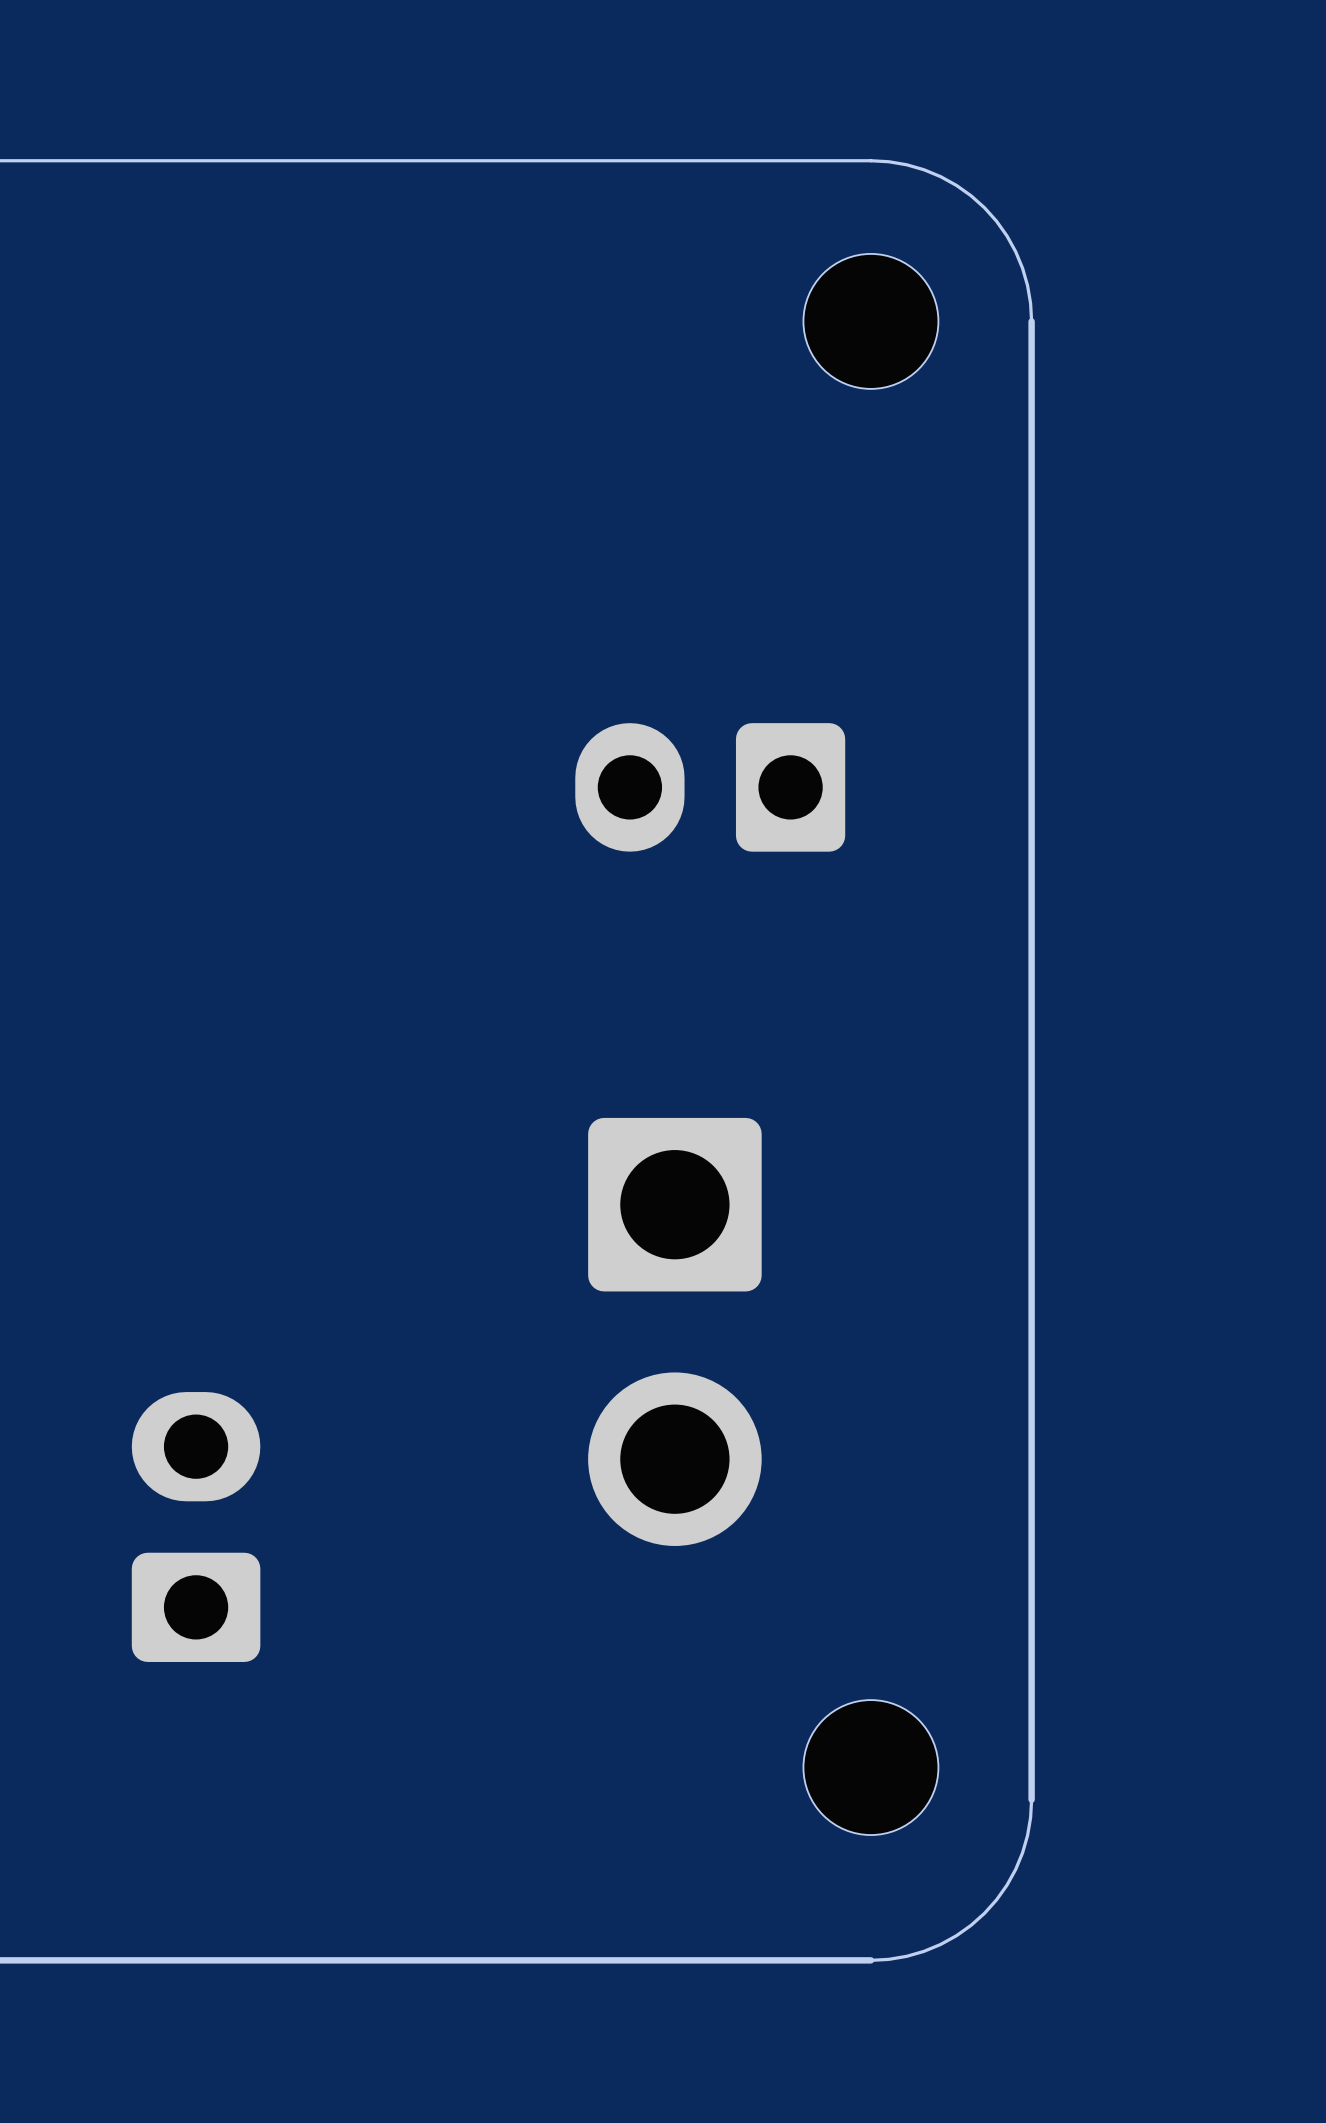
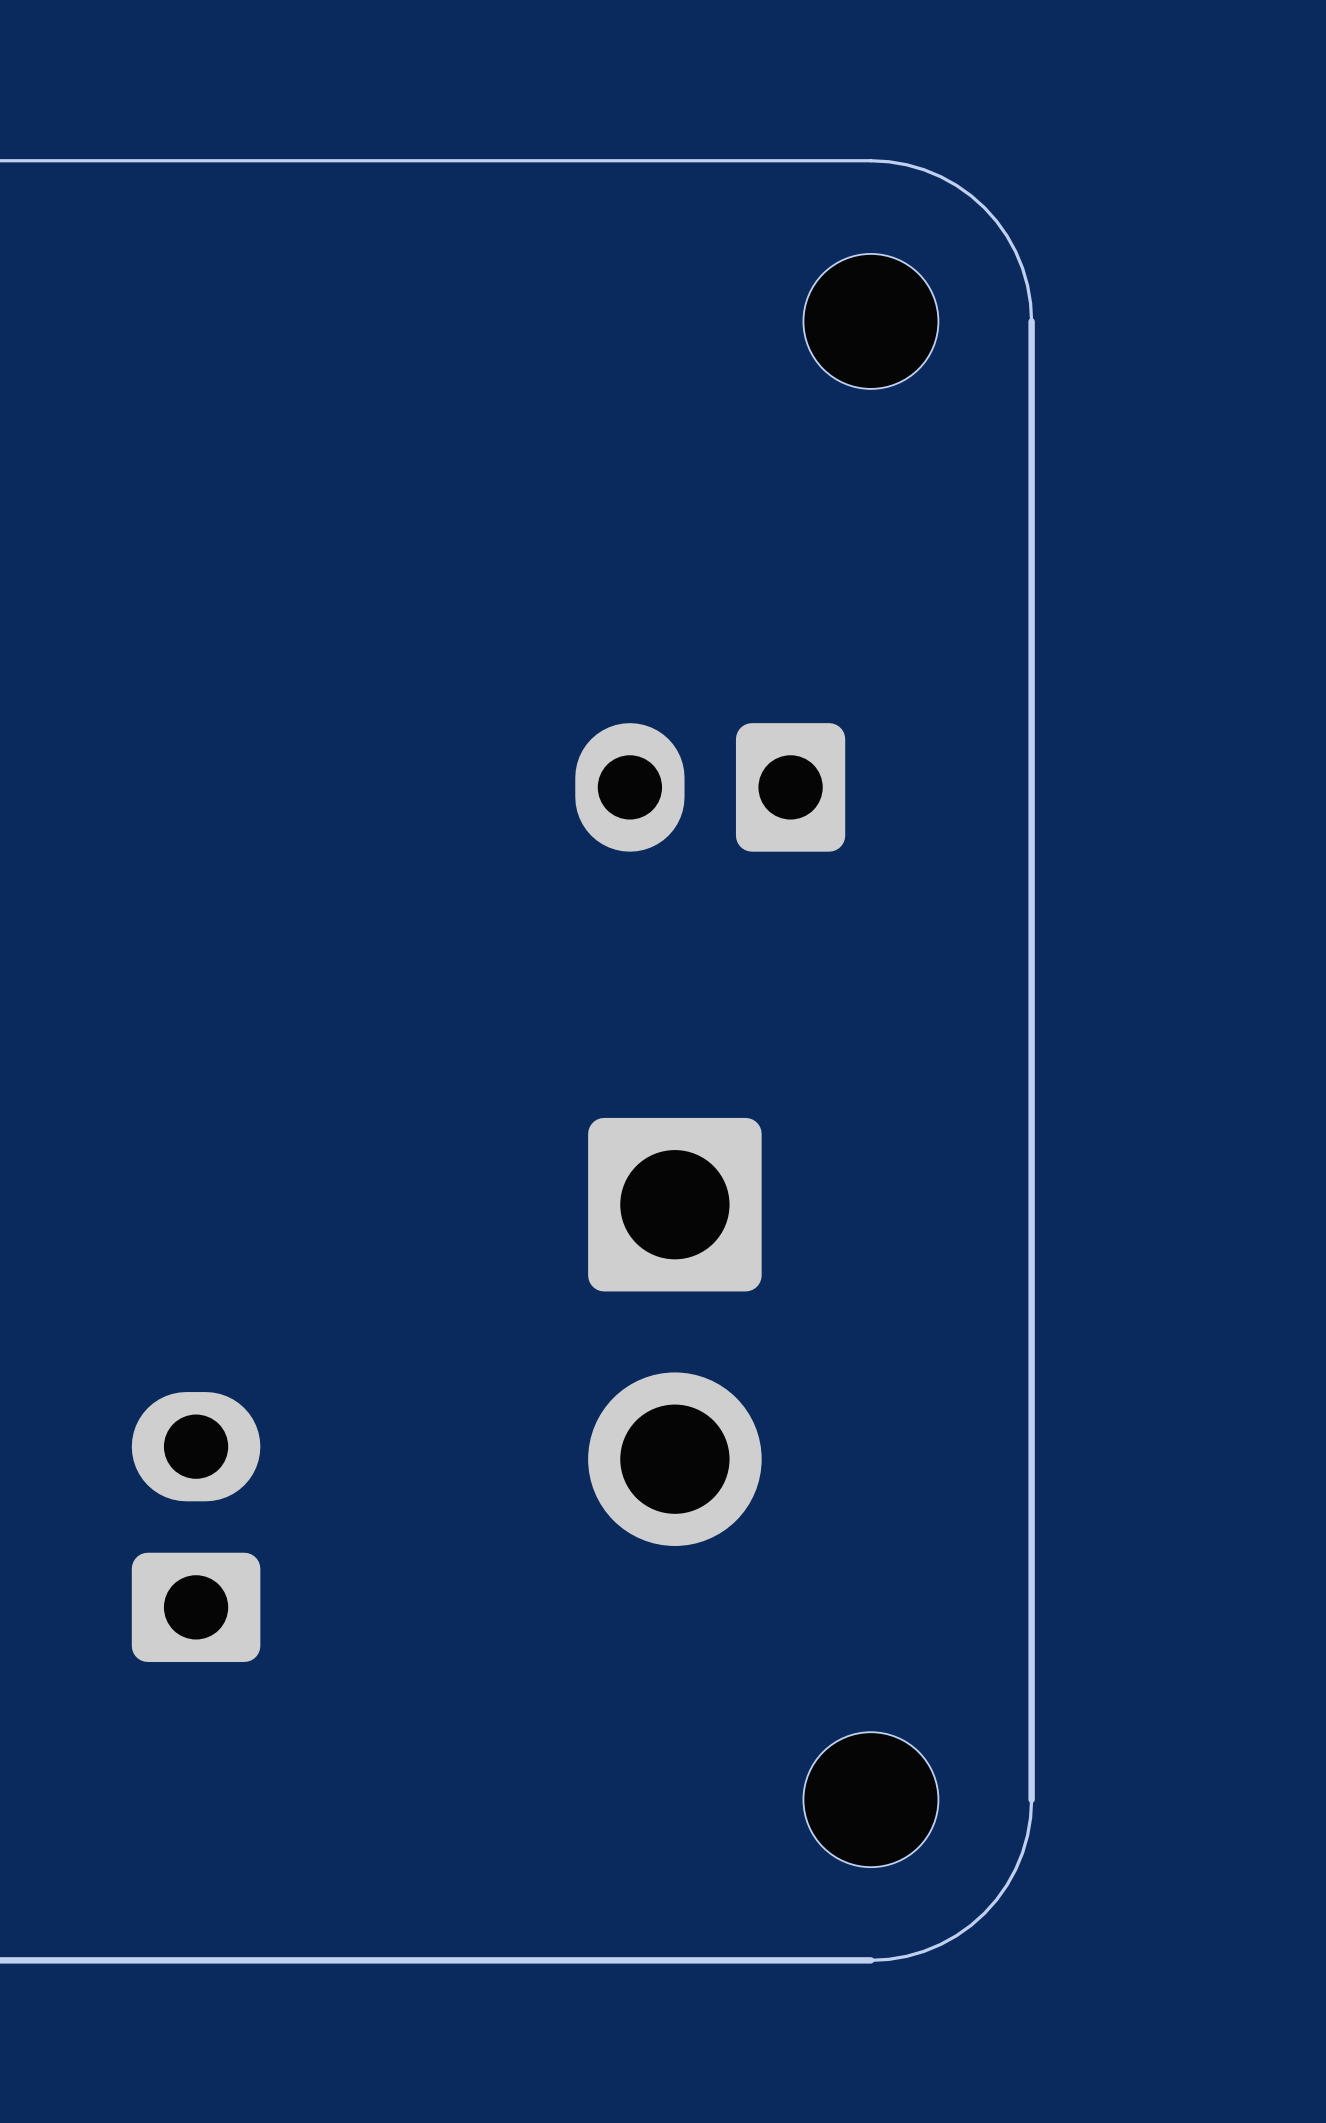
part position: (870, 1767) -> (870, 1799)

